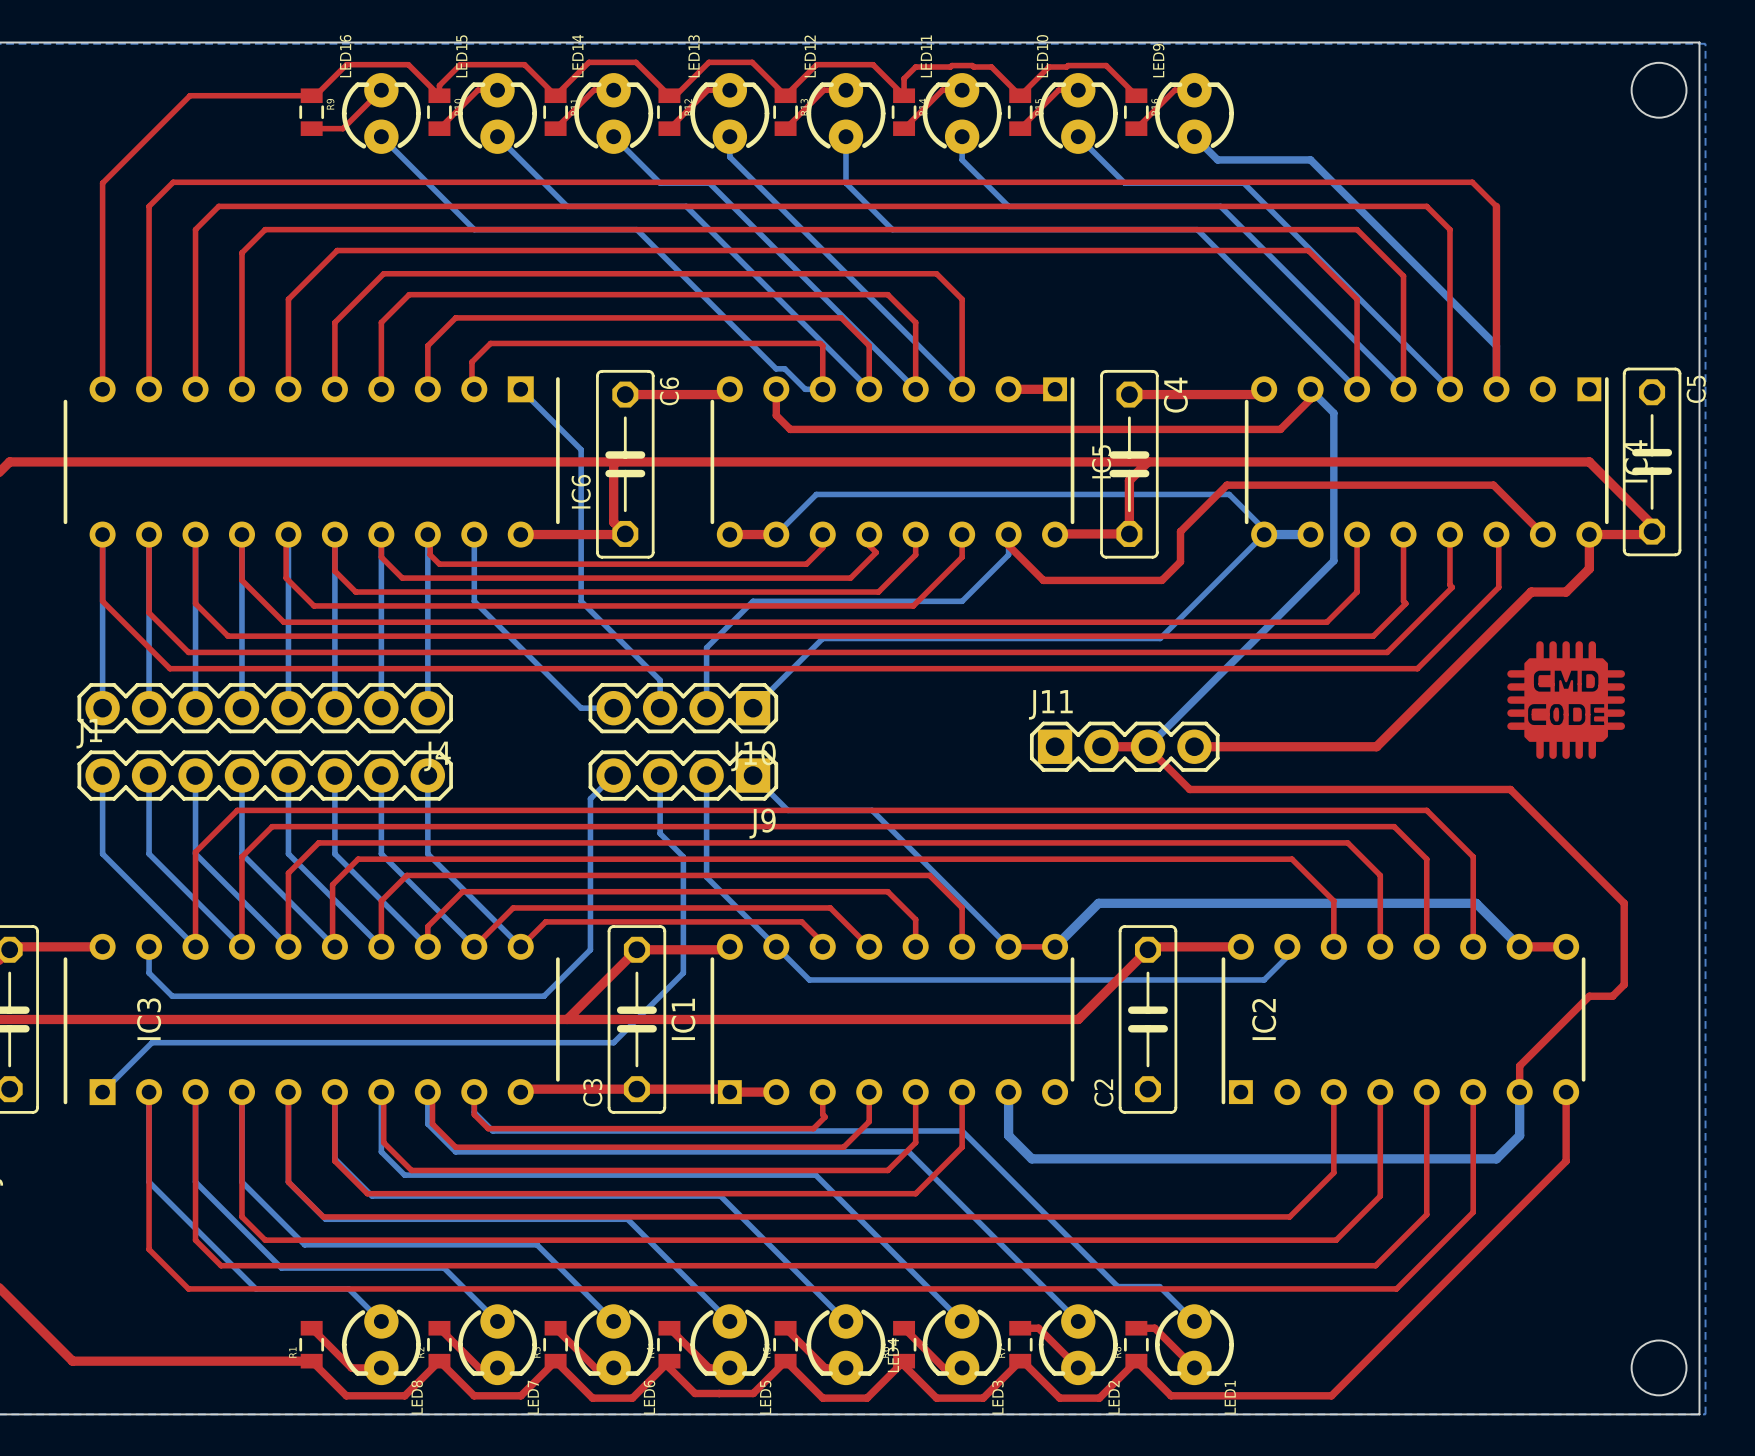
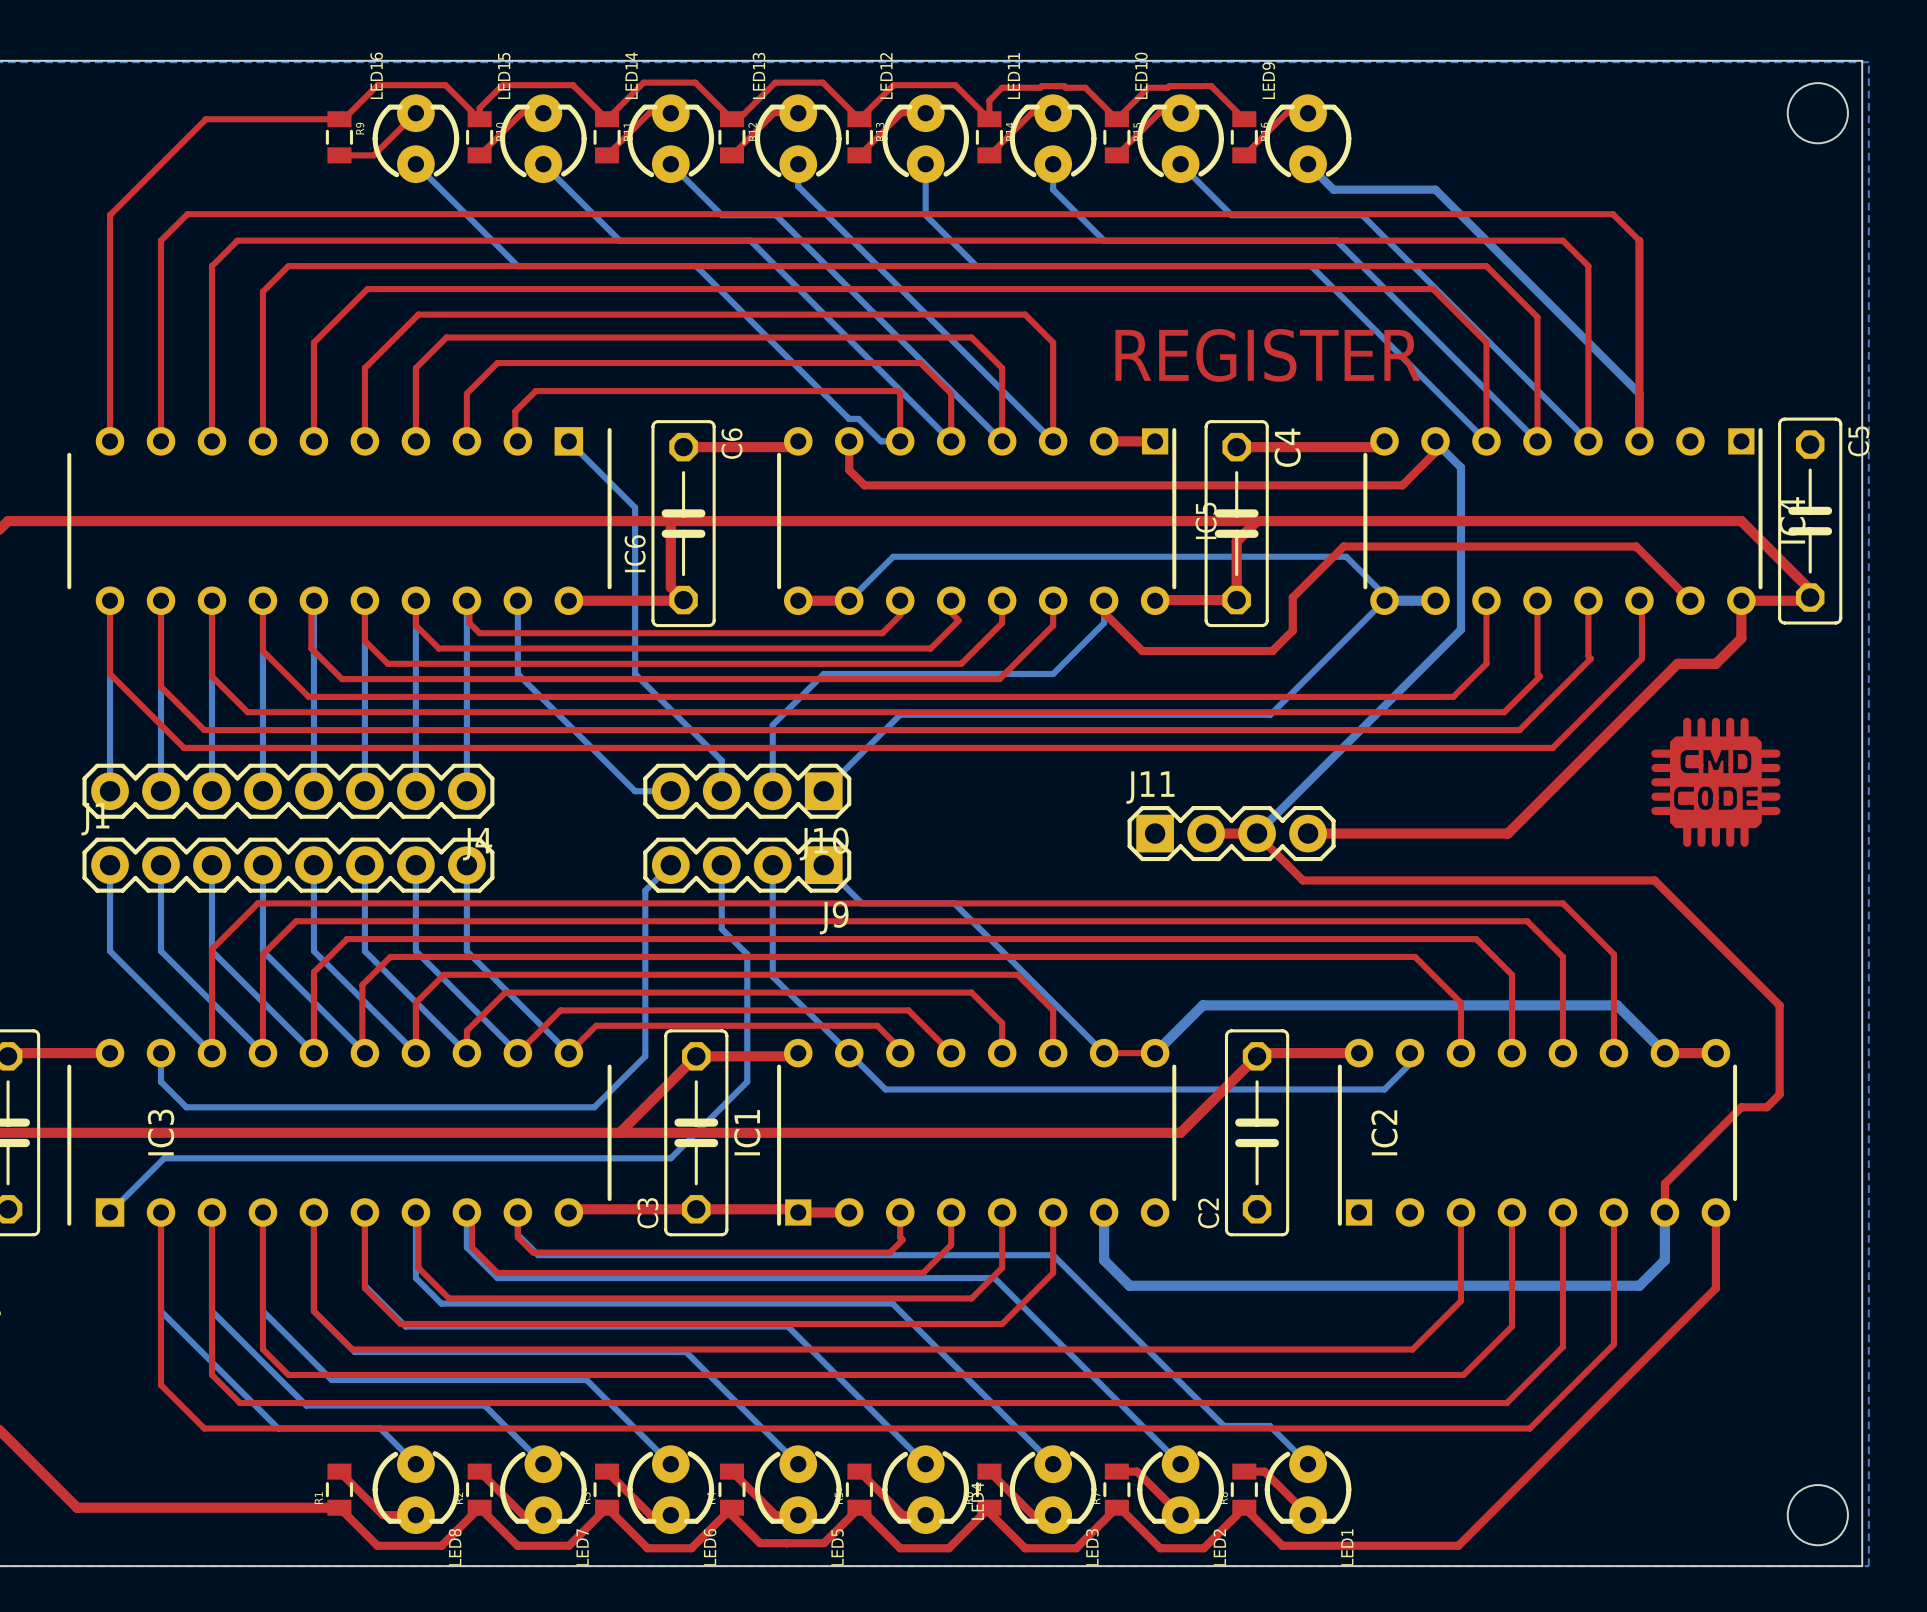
text: none -> REGISTER (1267, 355)

